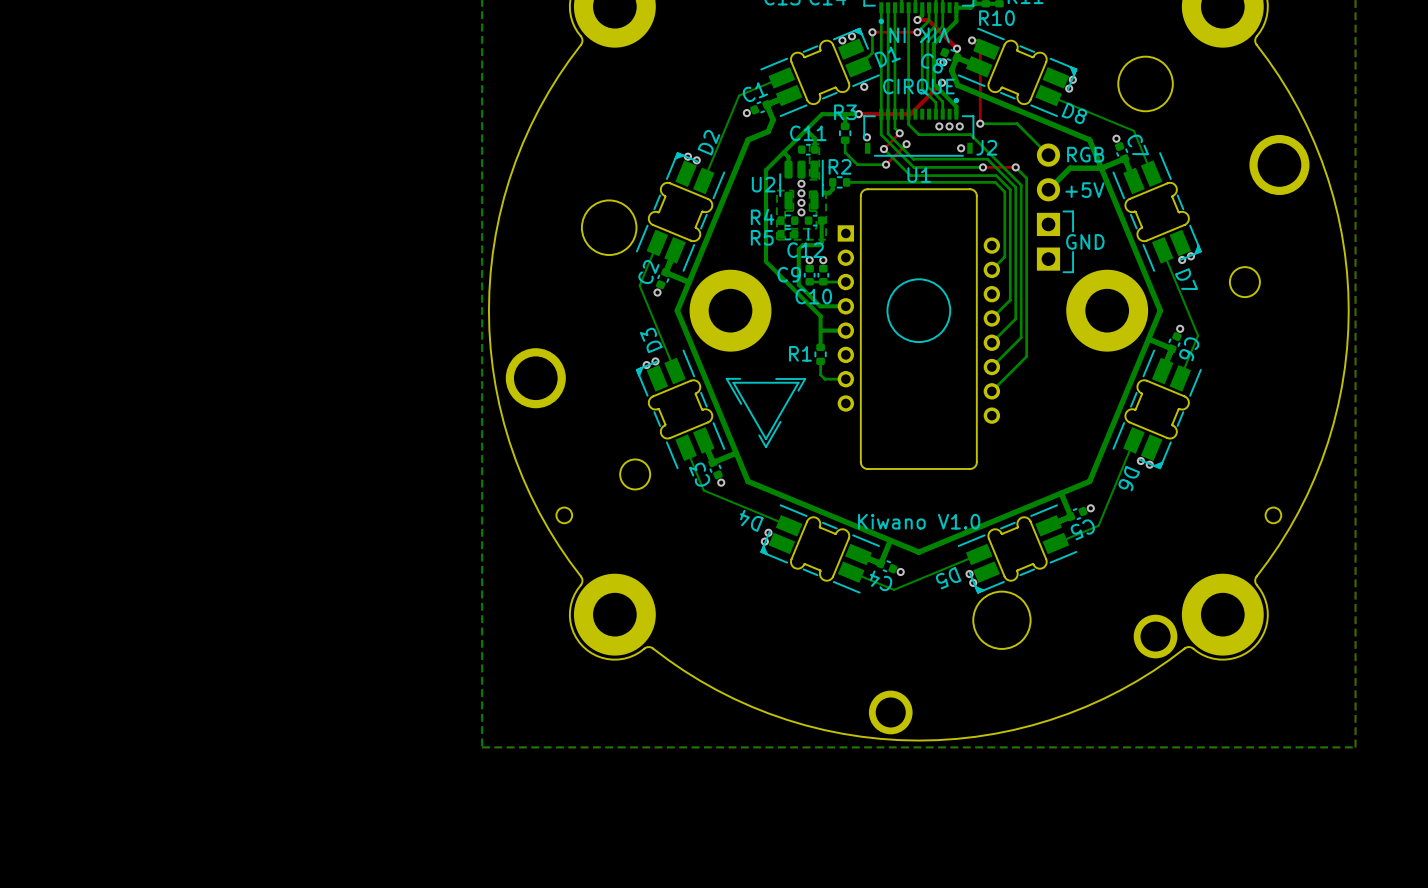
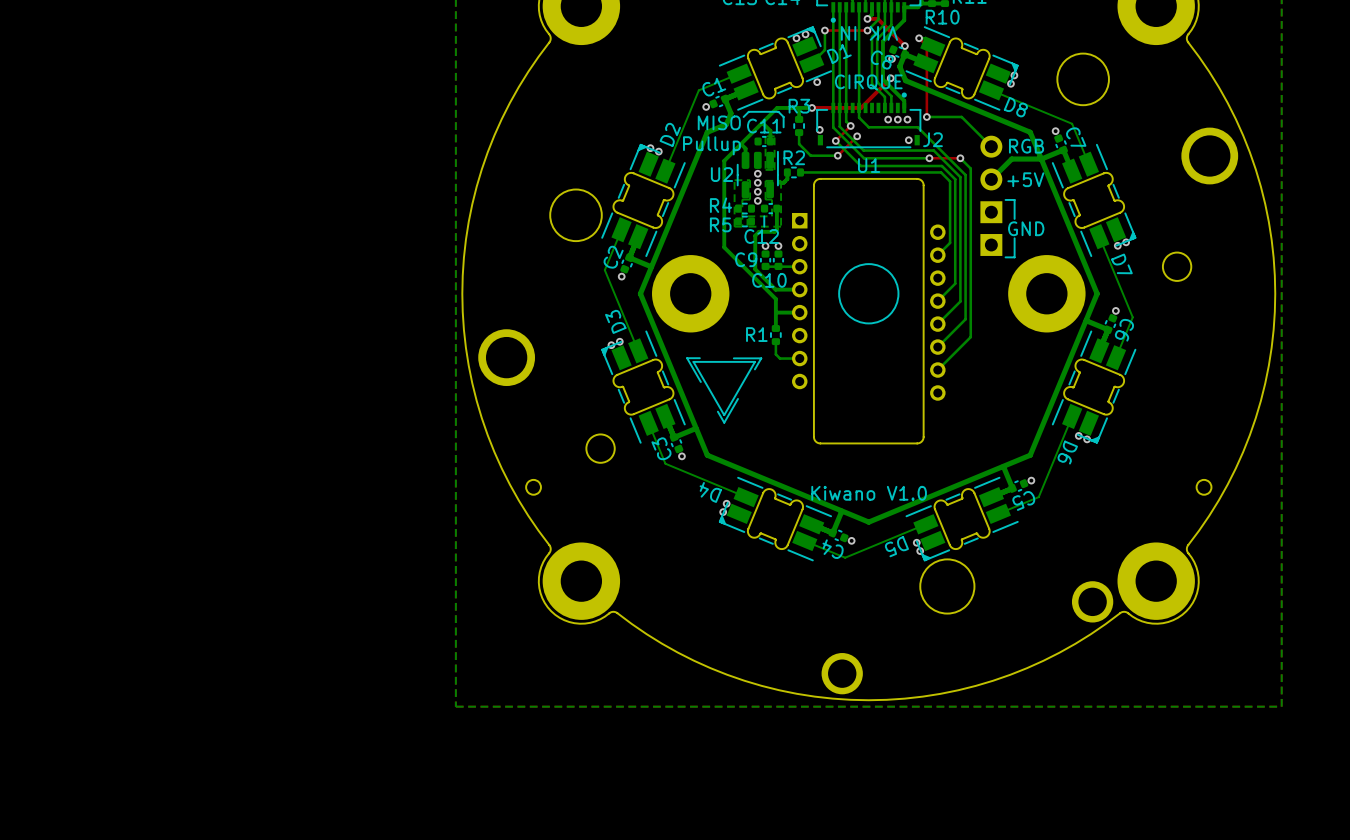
line: none -> (743, 116) (748, 111) (778, 111) (783, 116) (783, 127)
text: none -> MISO (719, 122)
text: none -> Pullup (711, 145)

